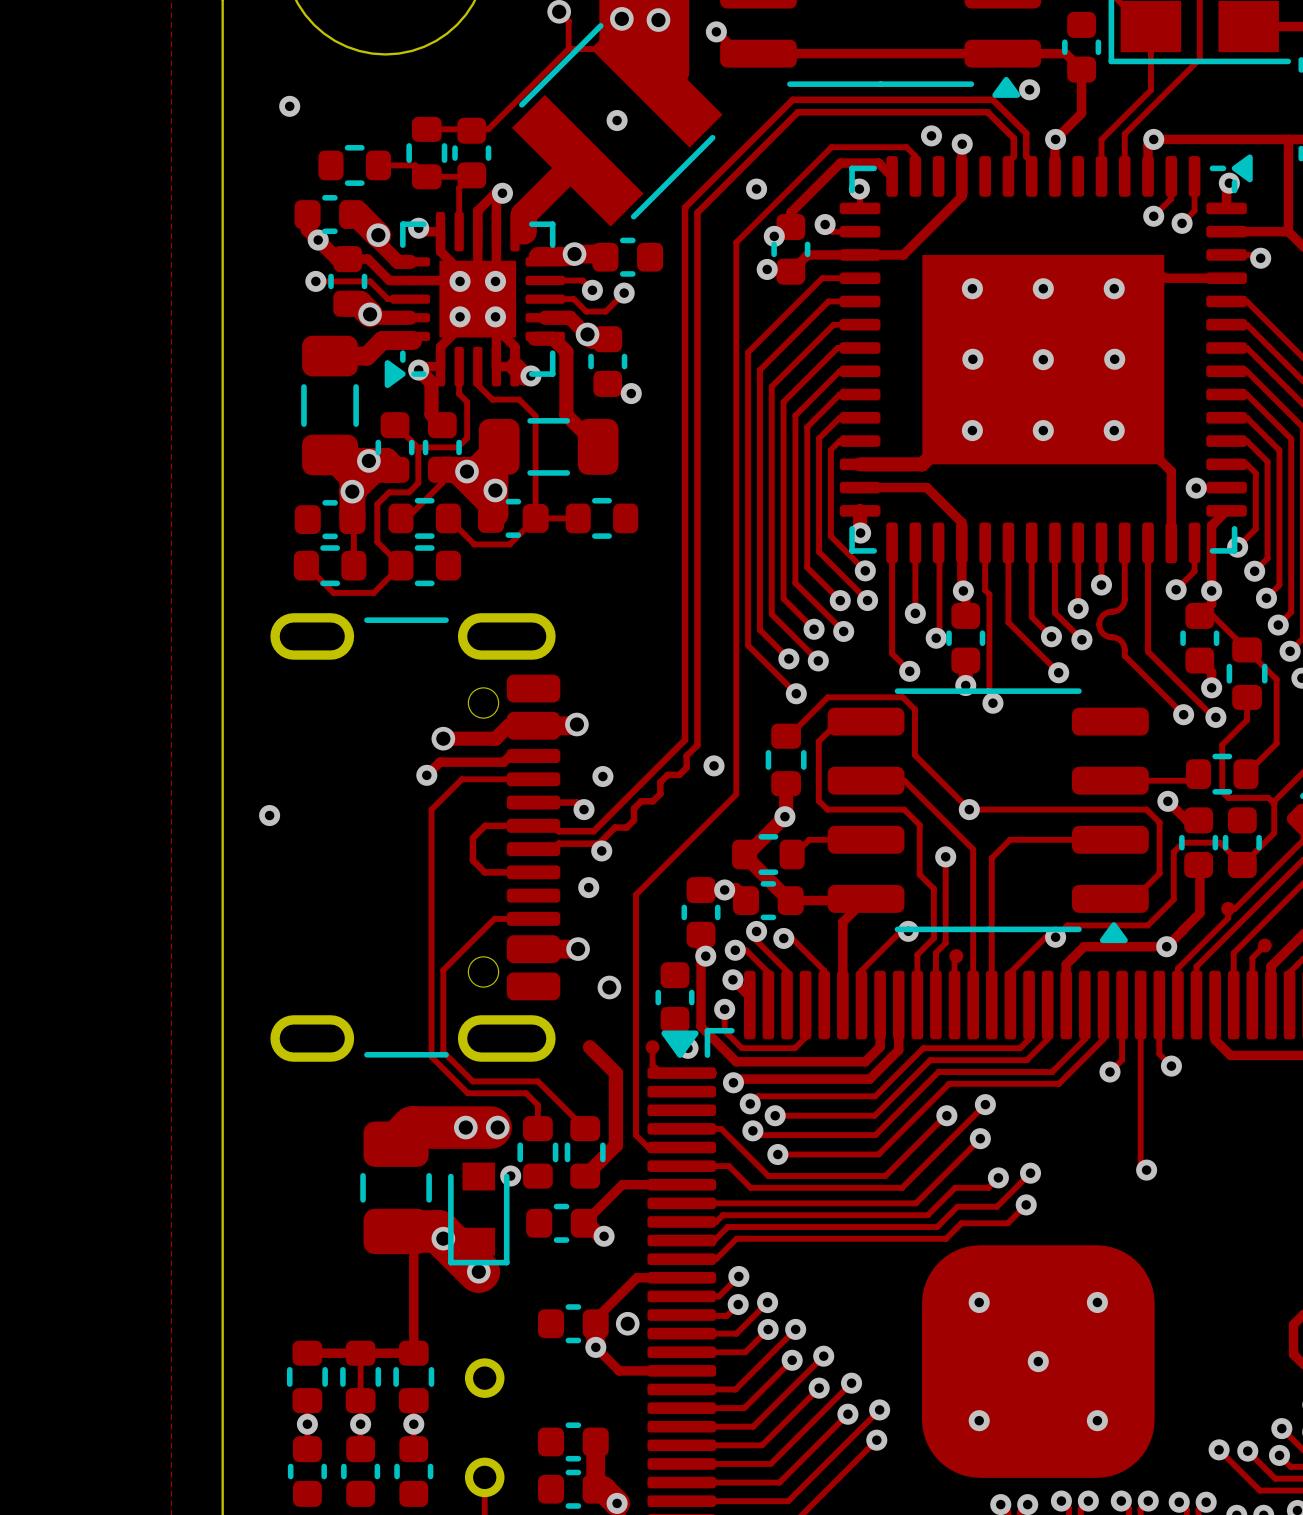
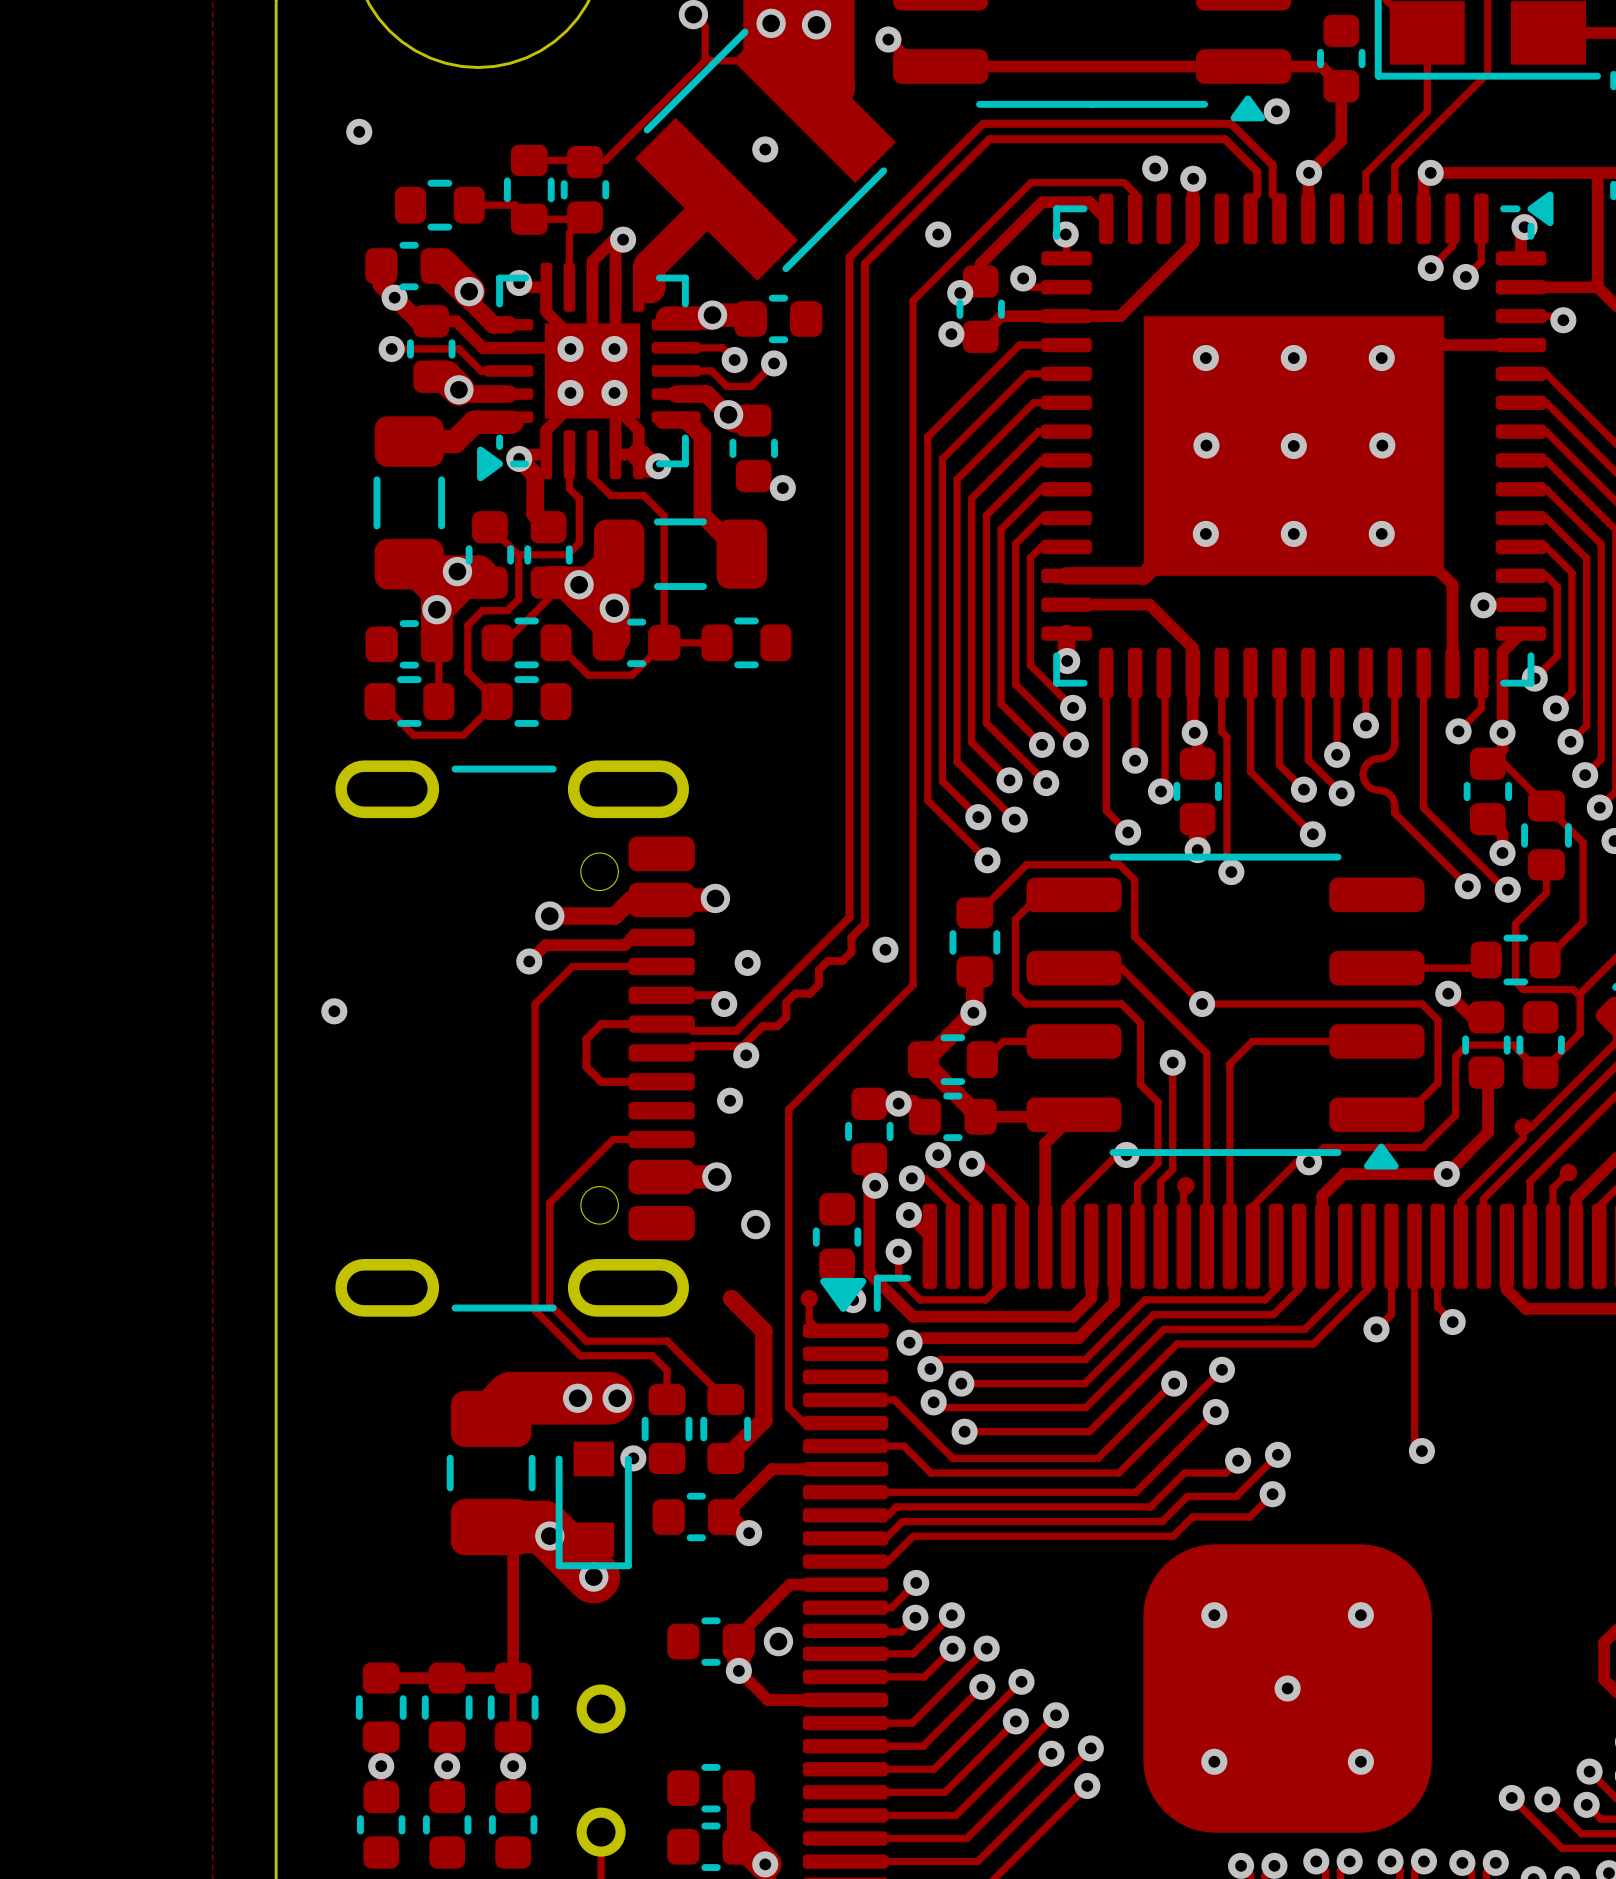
track: (360, 1353) (360, 1400) -> (513, 1678) (513, 1736)

